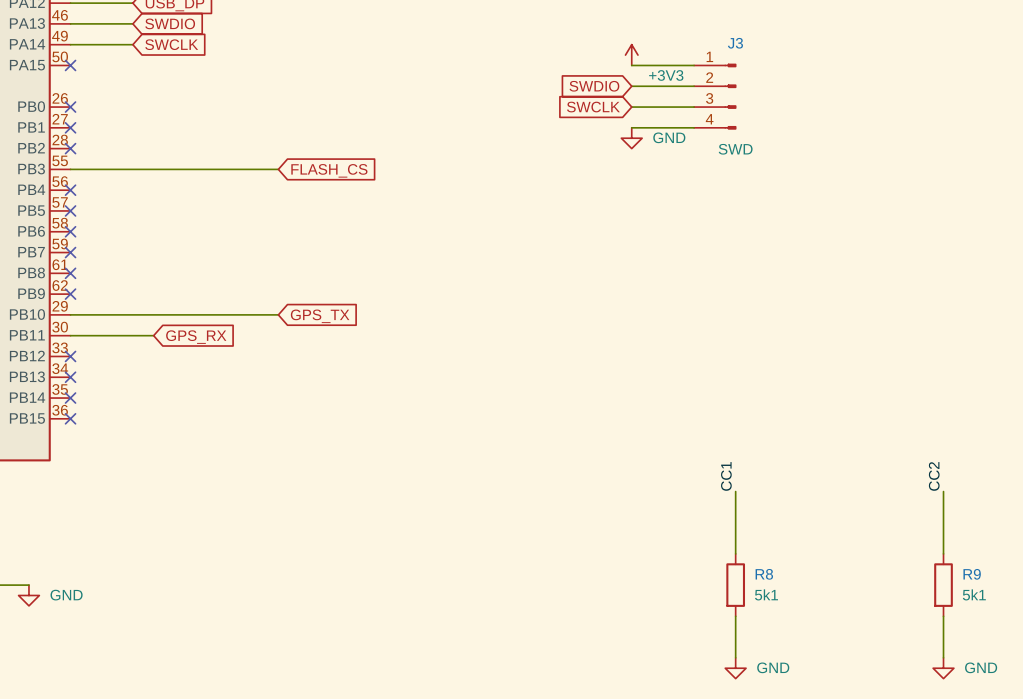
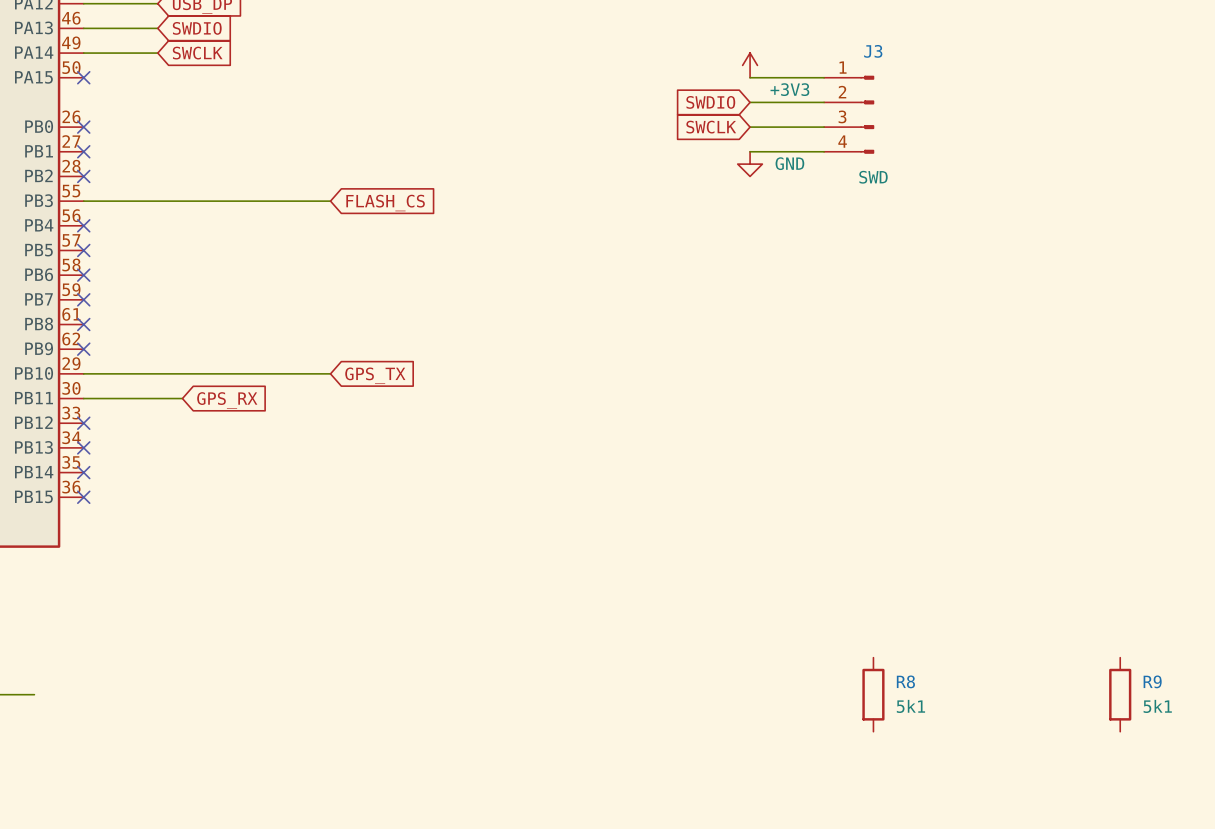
label: CC1 (726, 476) -> none
label: CC2 (934, 476) -> none
wire: (735, 491) (735, 553) -> none
wire: (943, 491) (943, 553) -> none
power symbol: GND (28, 595) -> none
wire: (735, 616) (735, 657) -> none
wire: (943, 616) (943, 657) -> none
power symbol: GND (735, 668) -> none
power symbol: GND (943, 668) -> none

